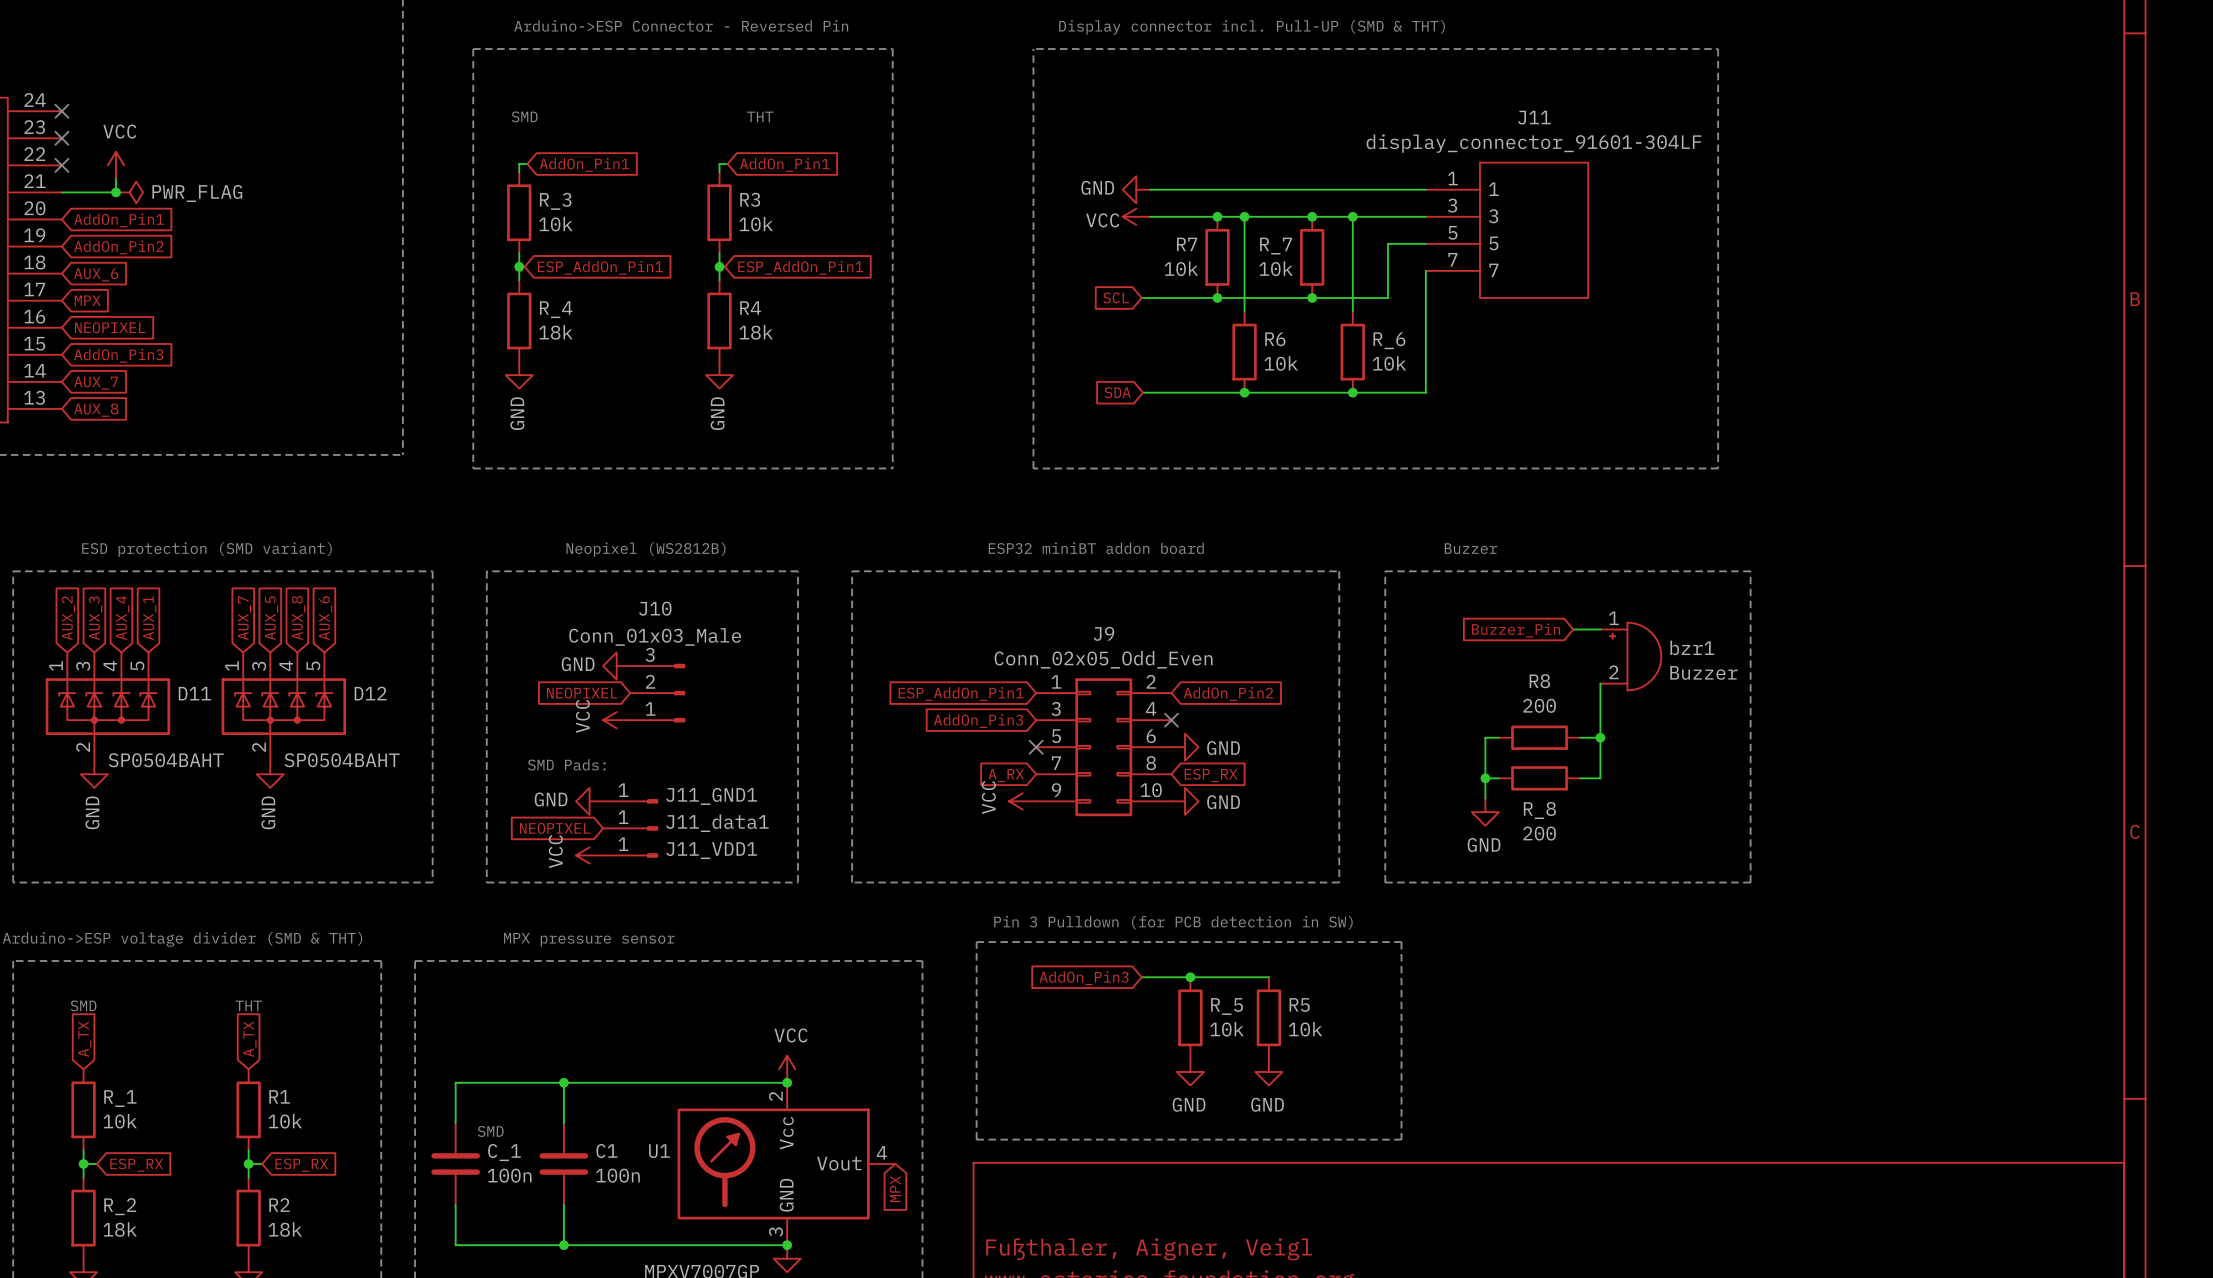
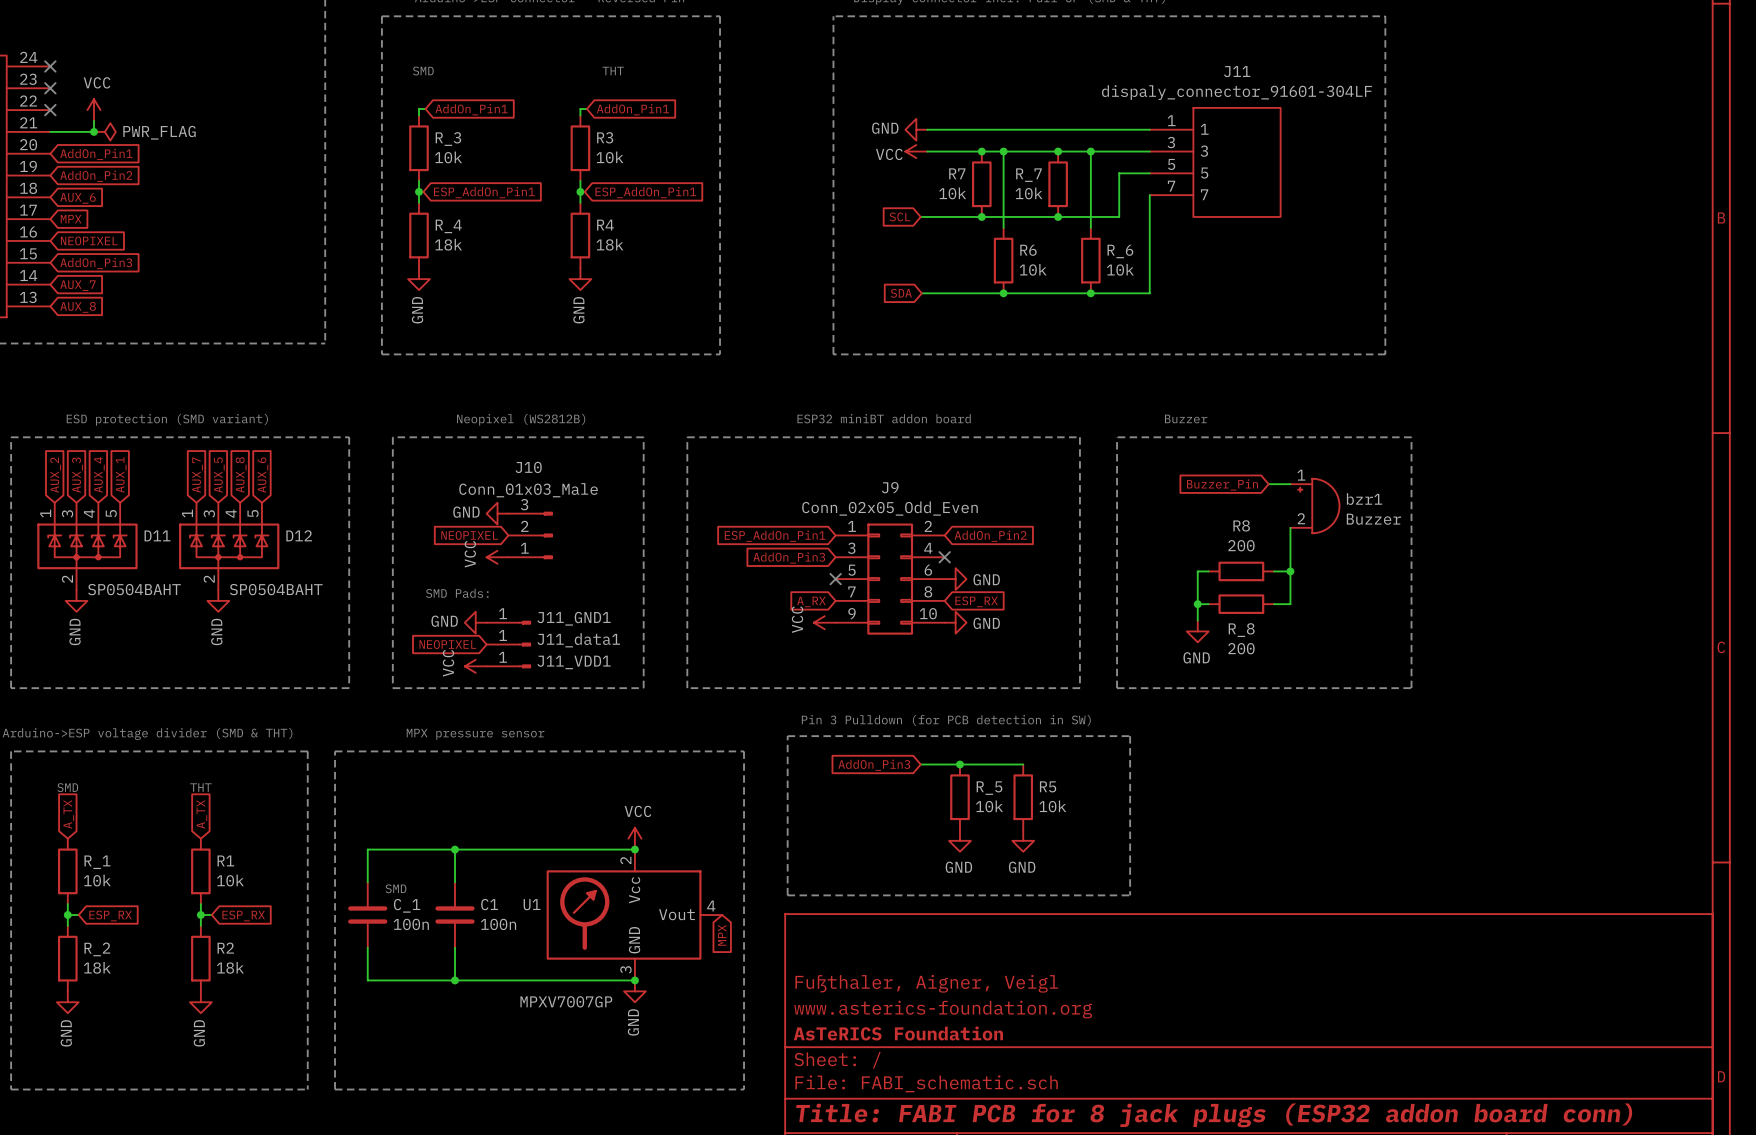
J11 value: display_connector_91601-304LF (1534, 143) -> dispaly_connector_91601-304LF (1236, 92)

